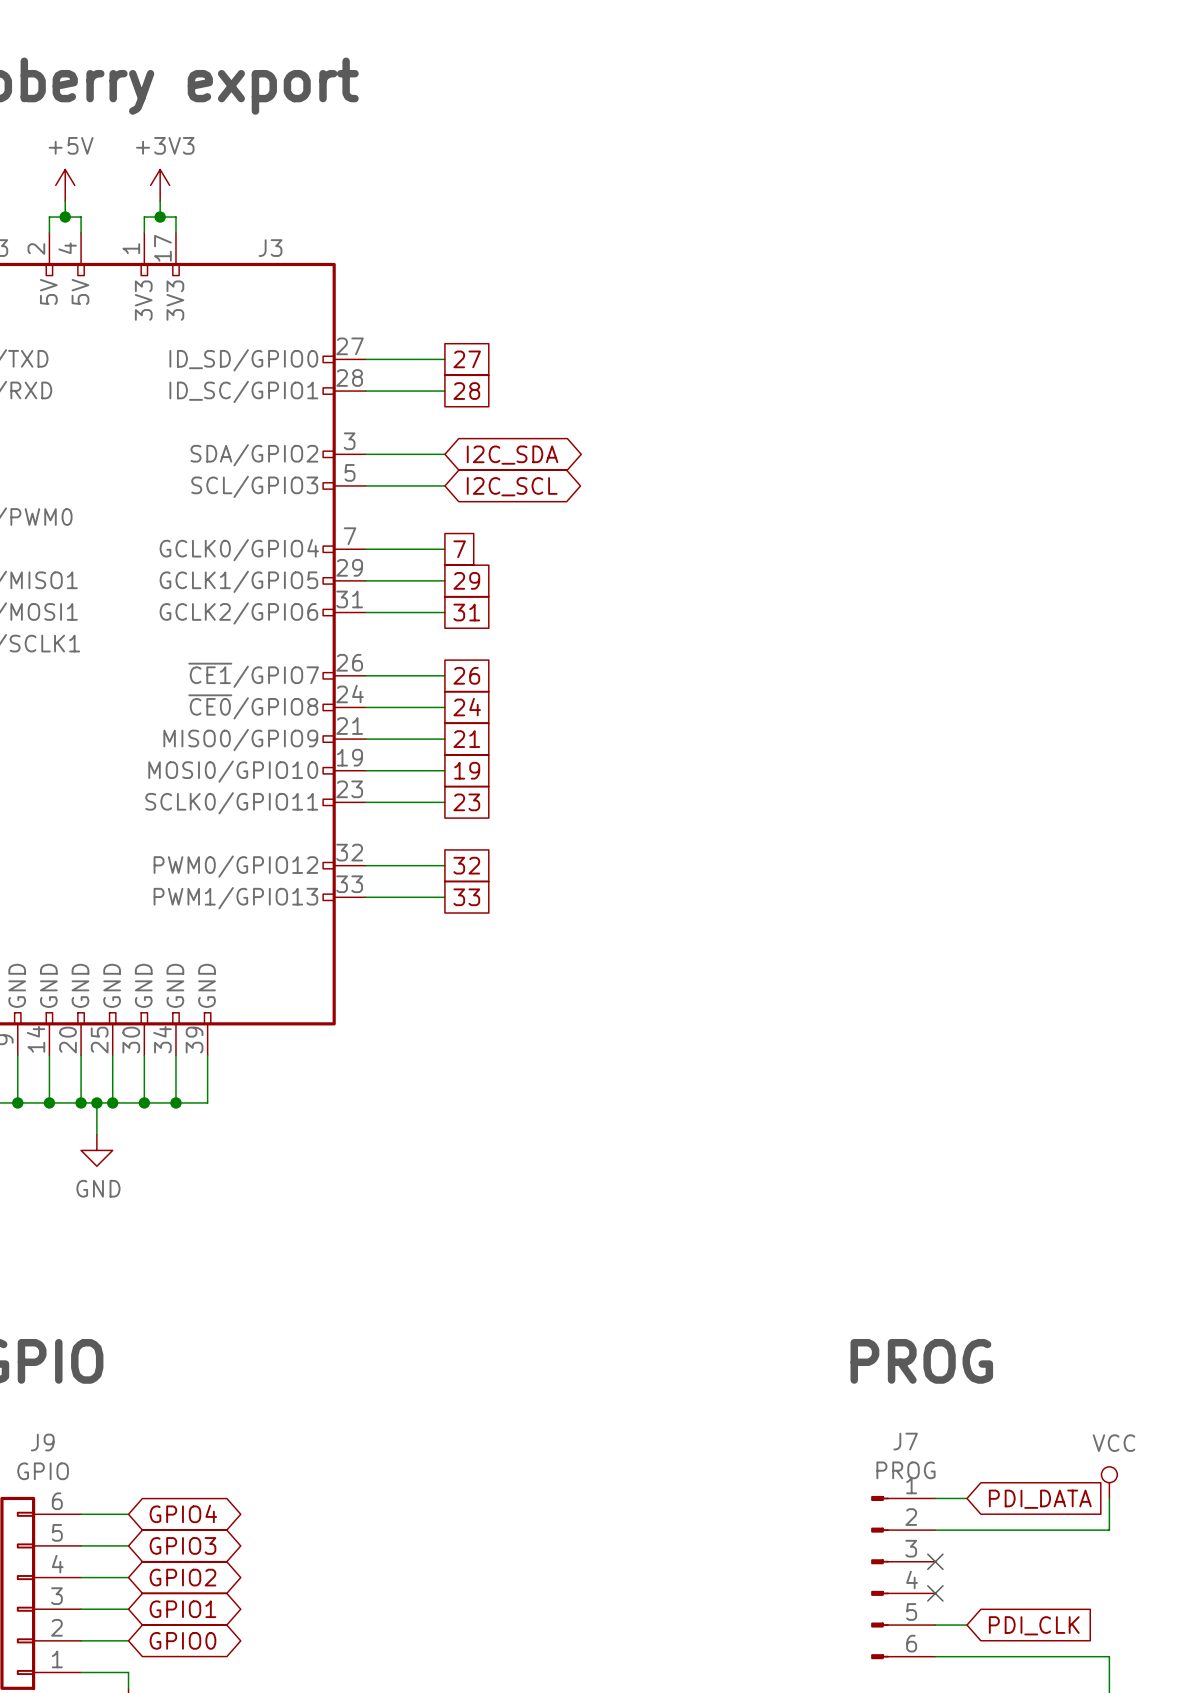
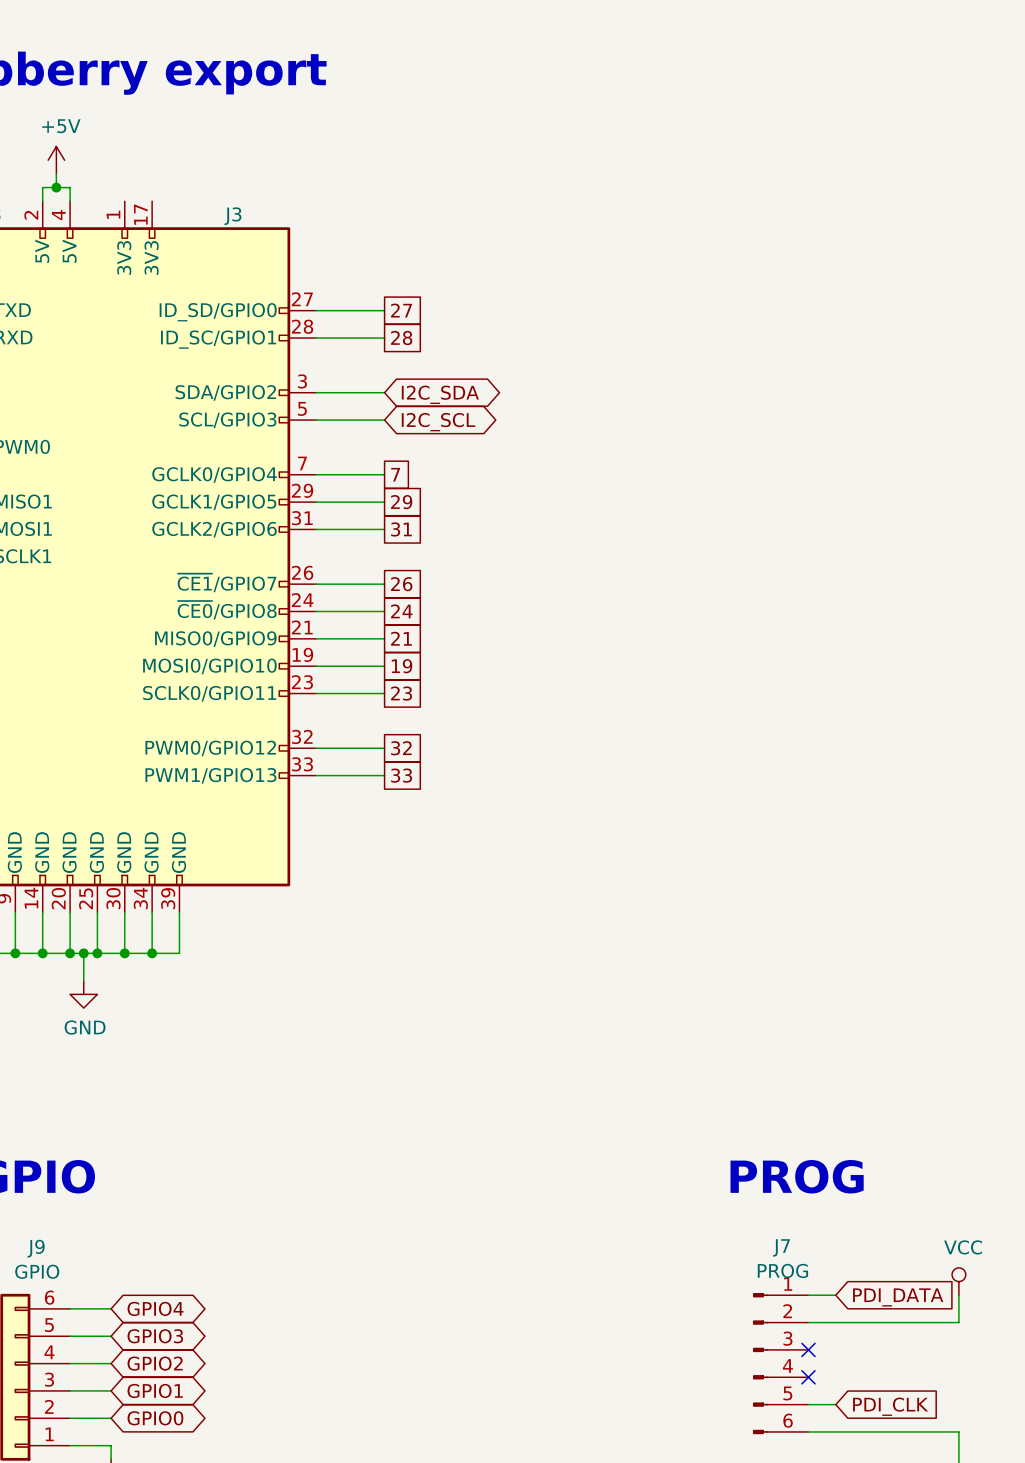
power symbol: +3V3 (160, 185) -> none
wire: (160, 201) (160, 217) -> none
junction: (160, 217) -> none
wire: (144, 232) (144, 217) (175, 217) (175, 232) -> none

